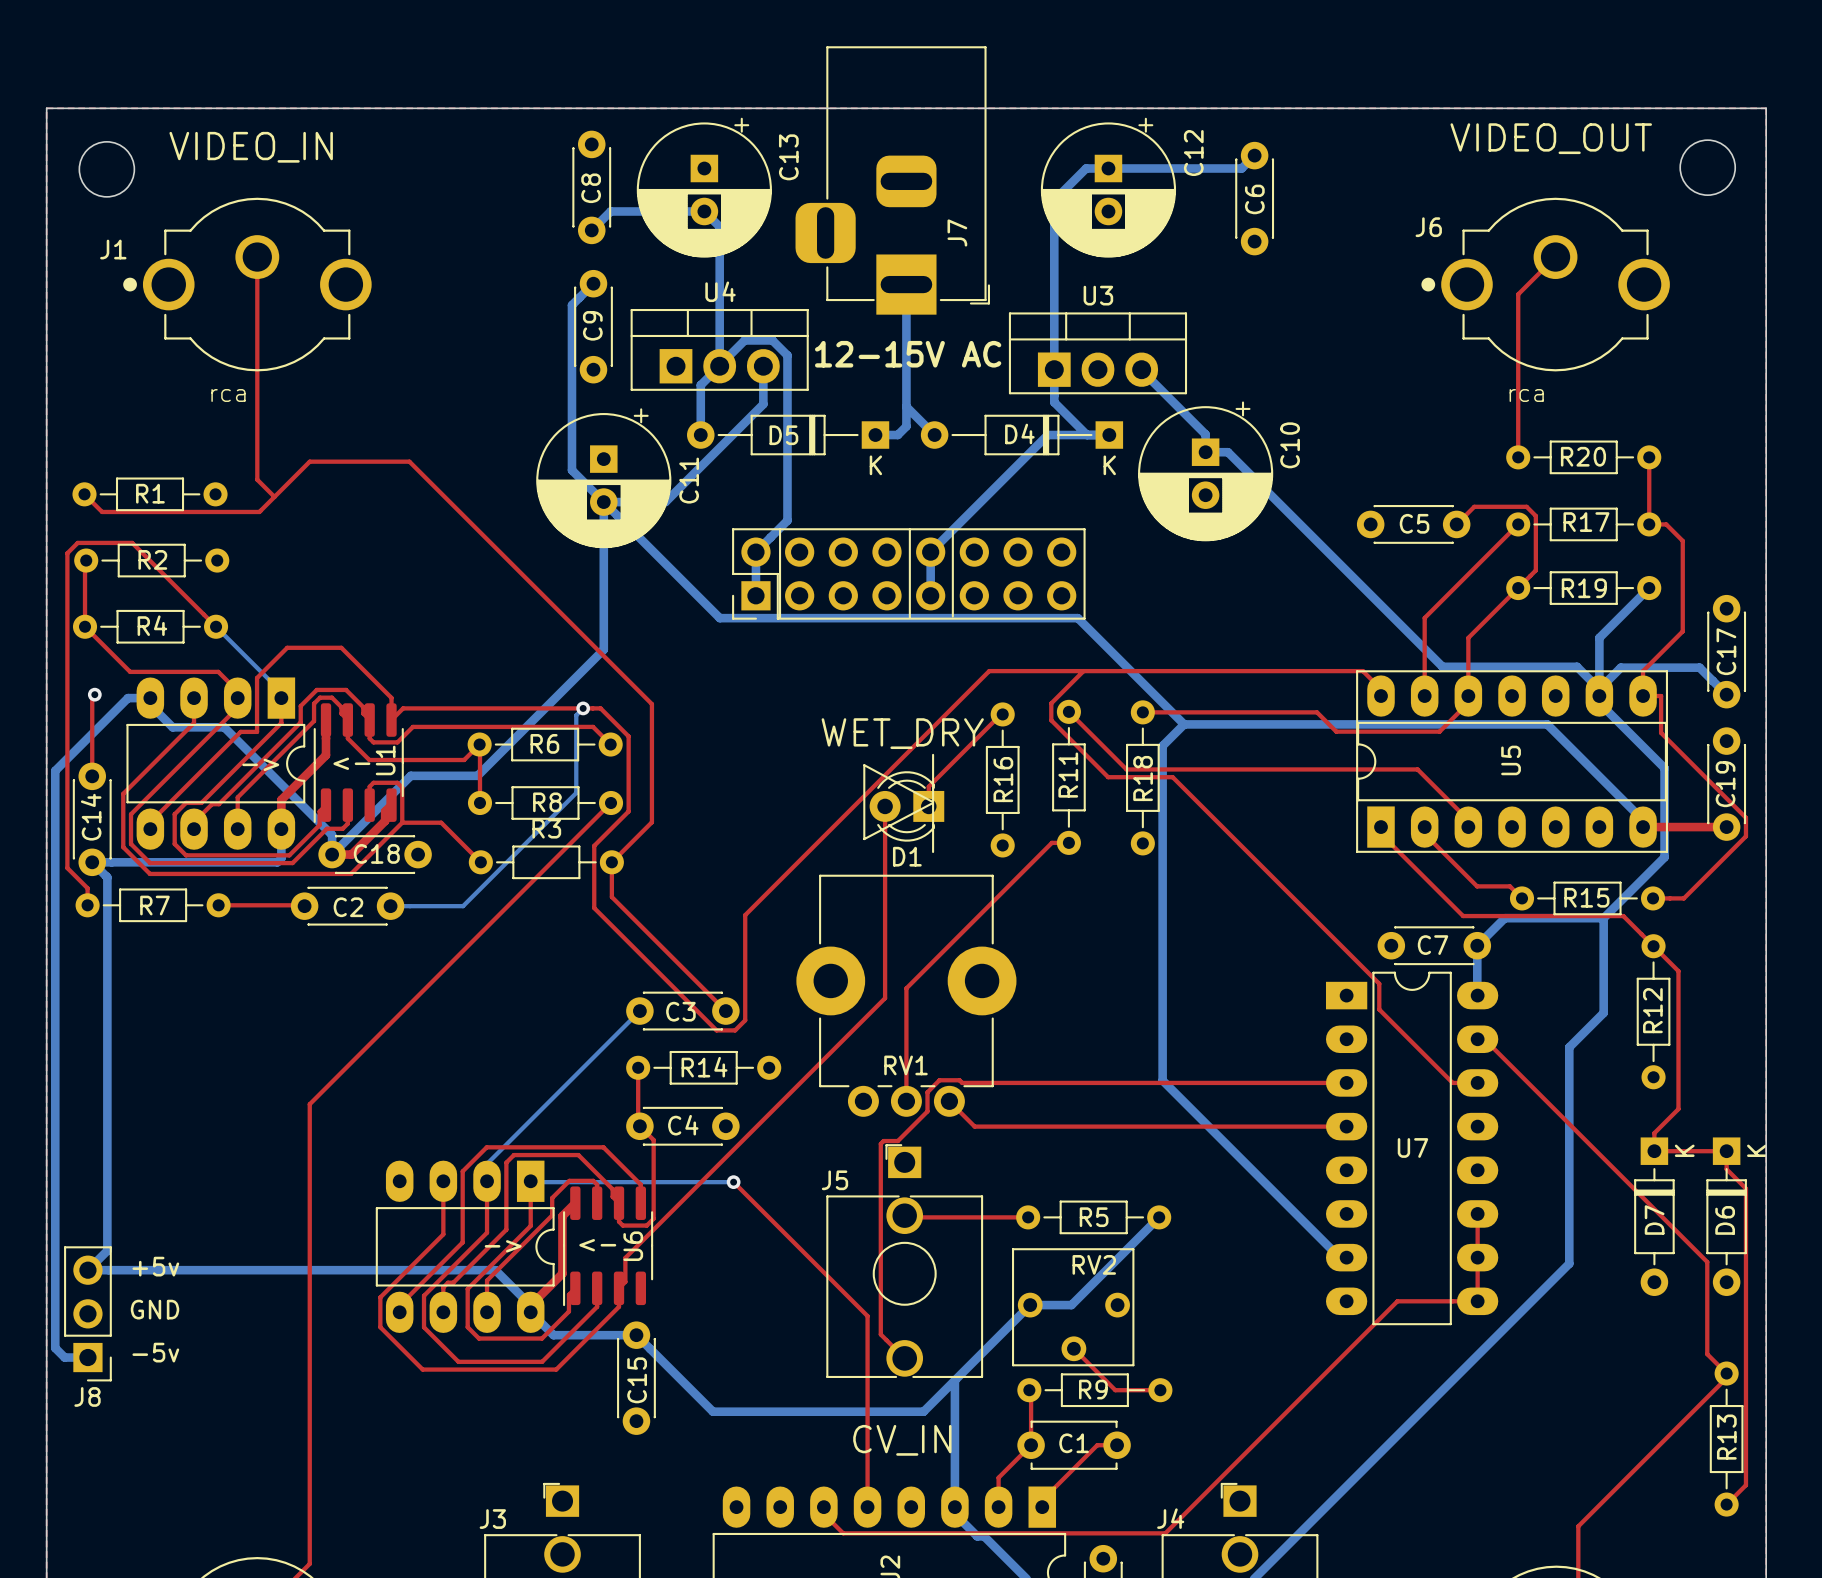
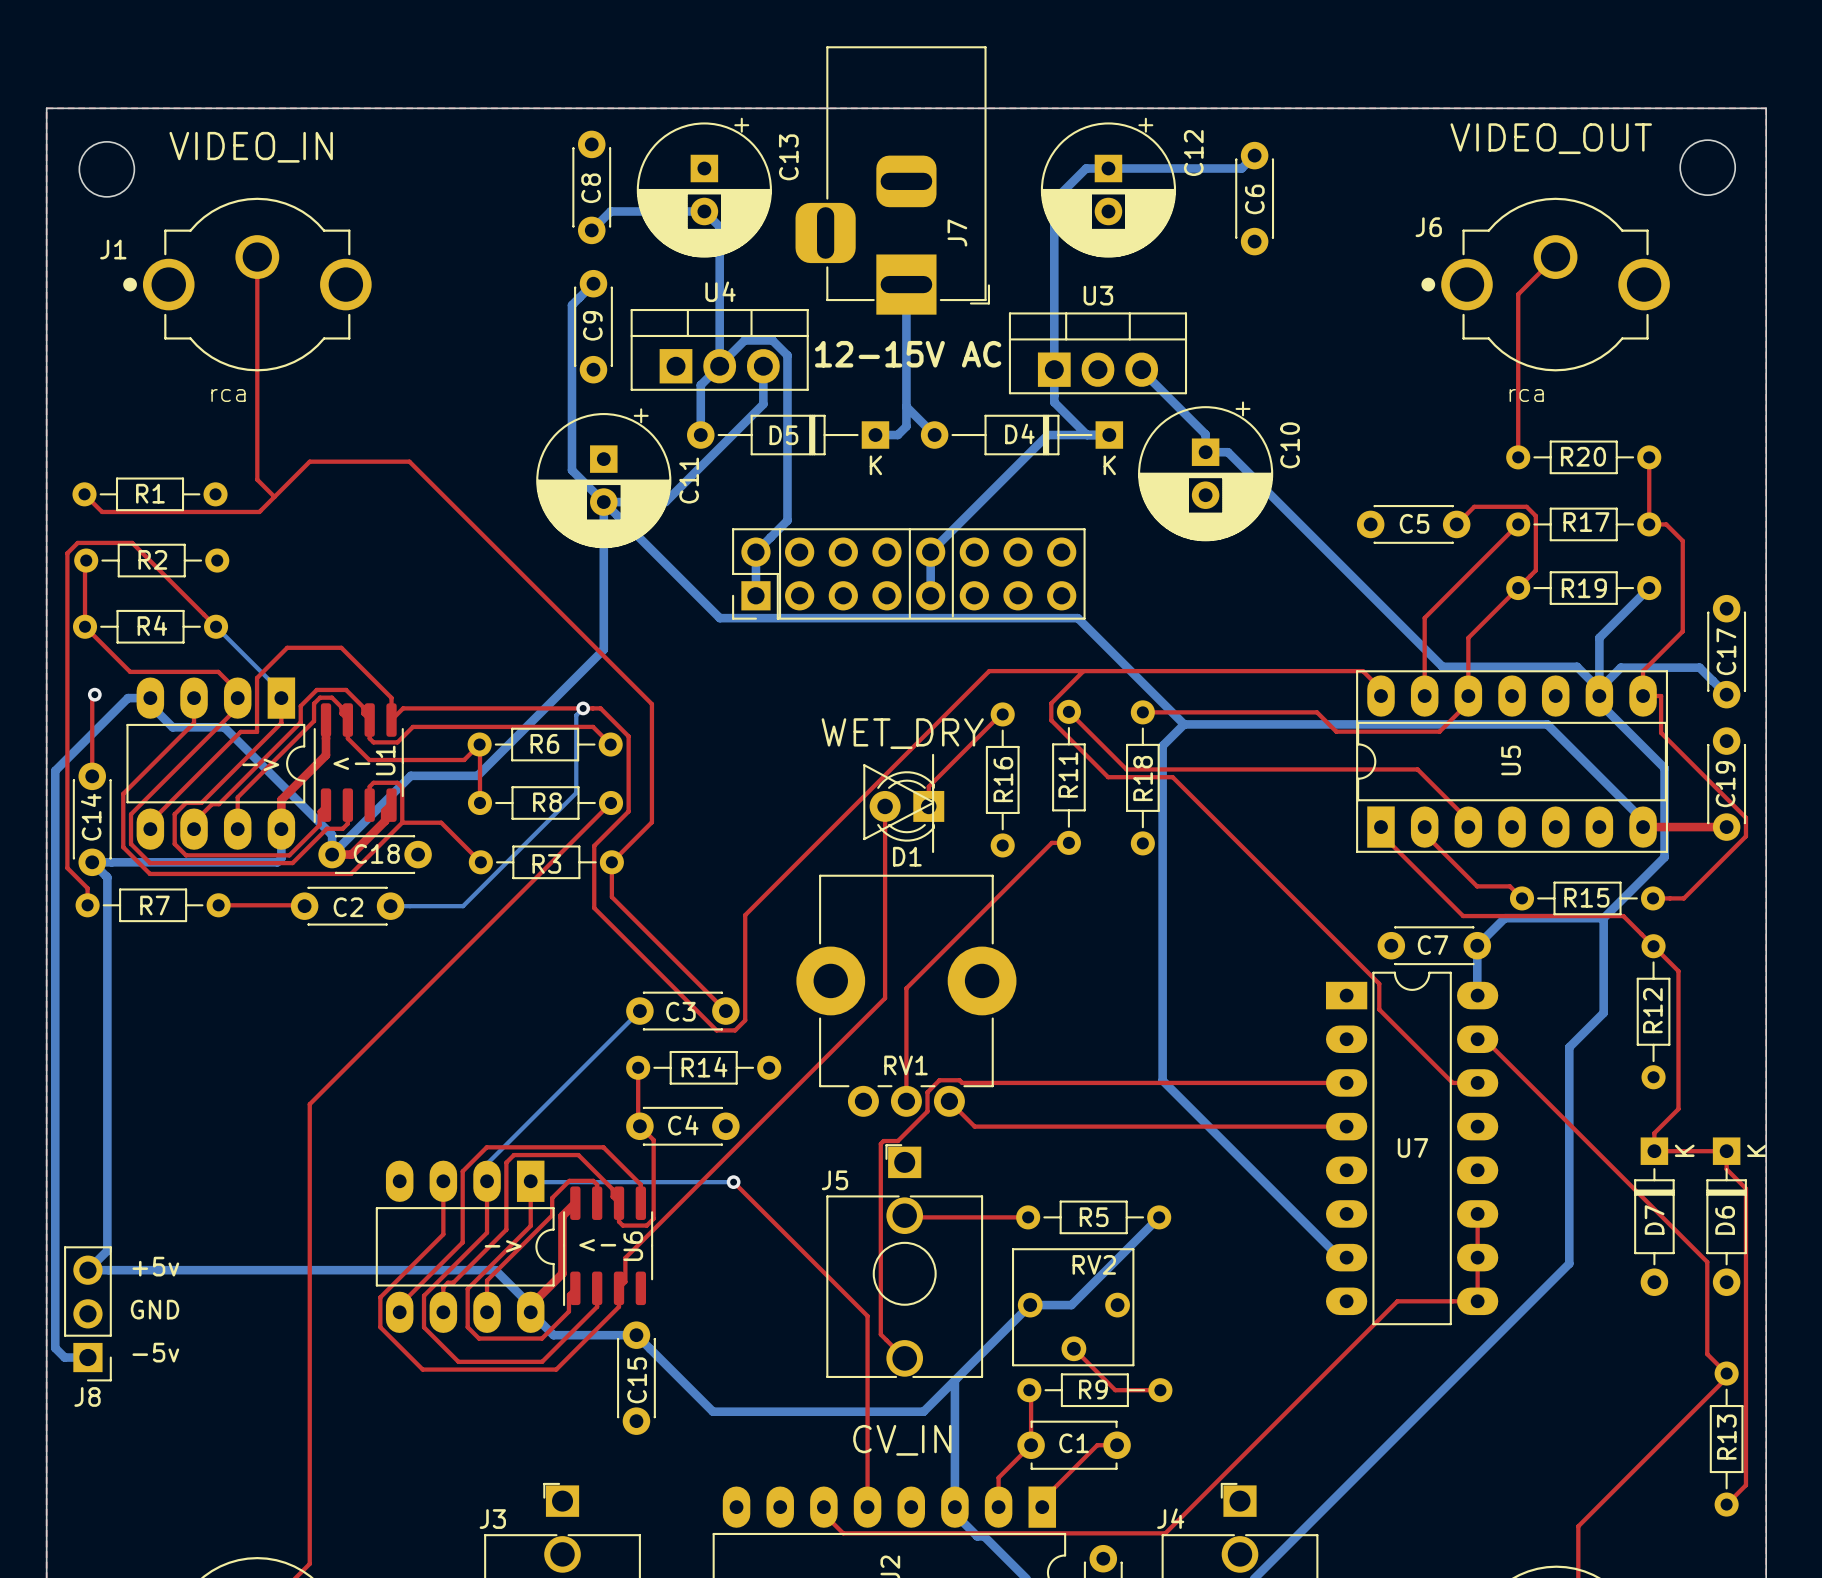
R3 name position: R3 (546, 828) -> R3 (546, 863)

